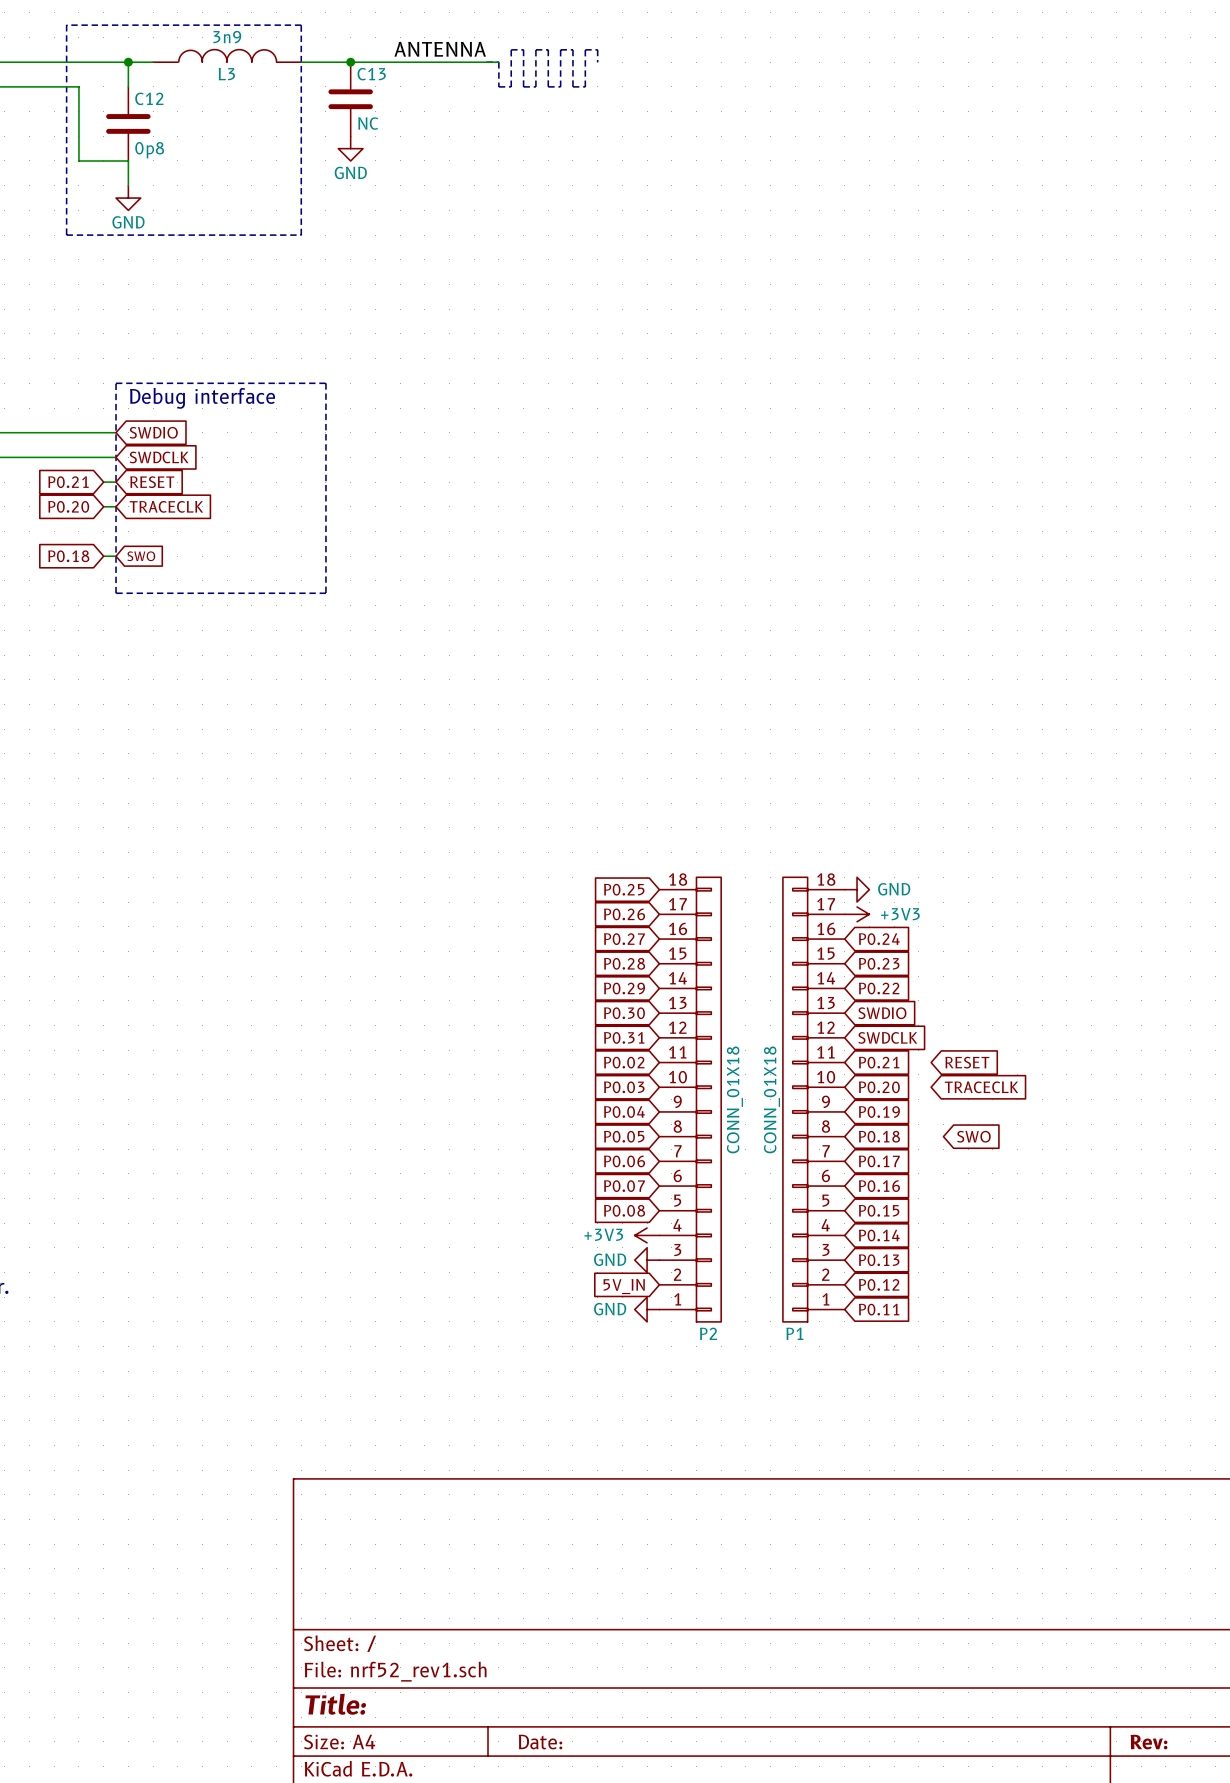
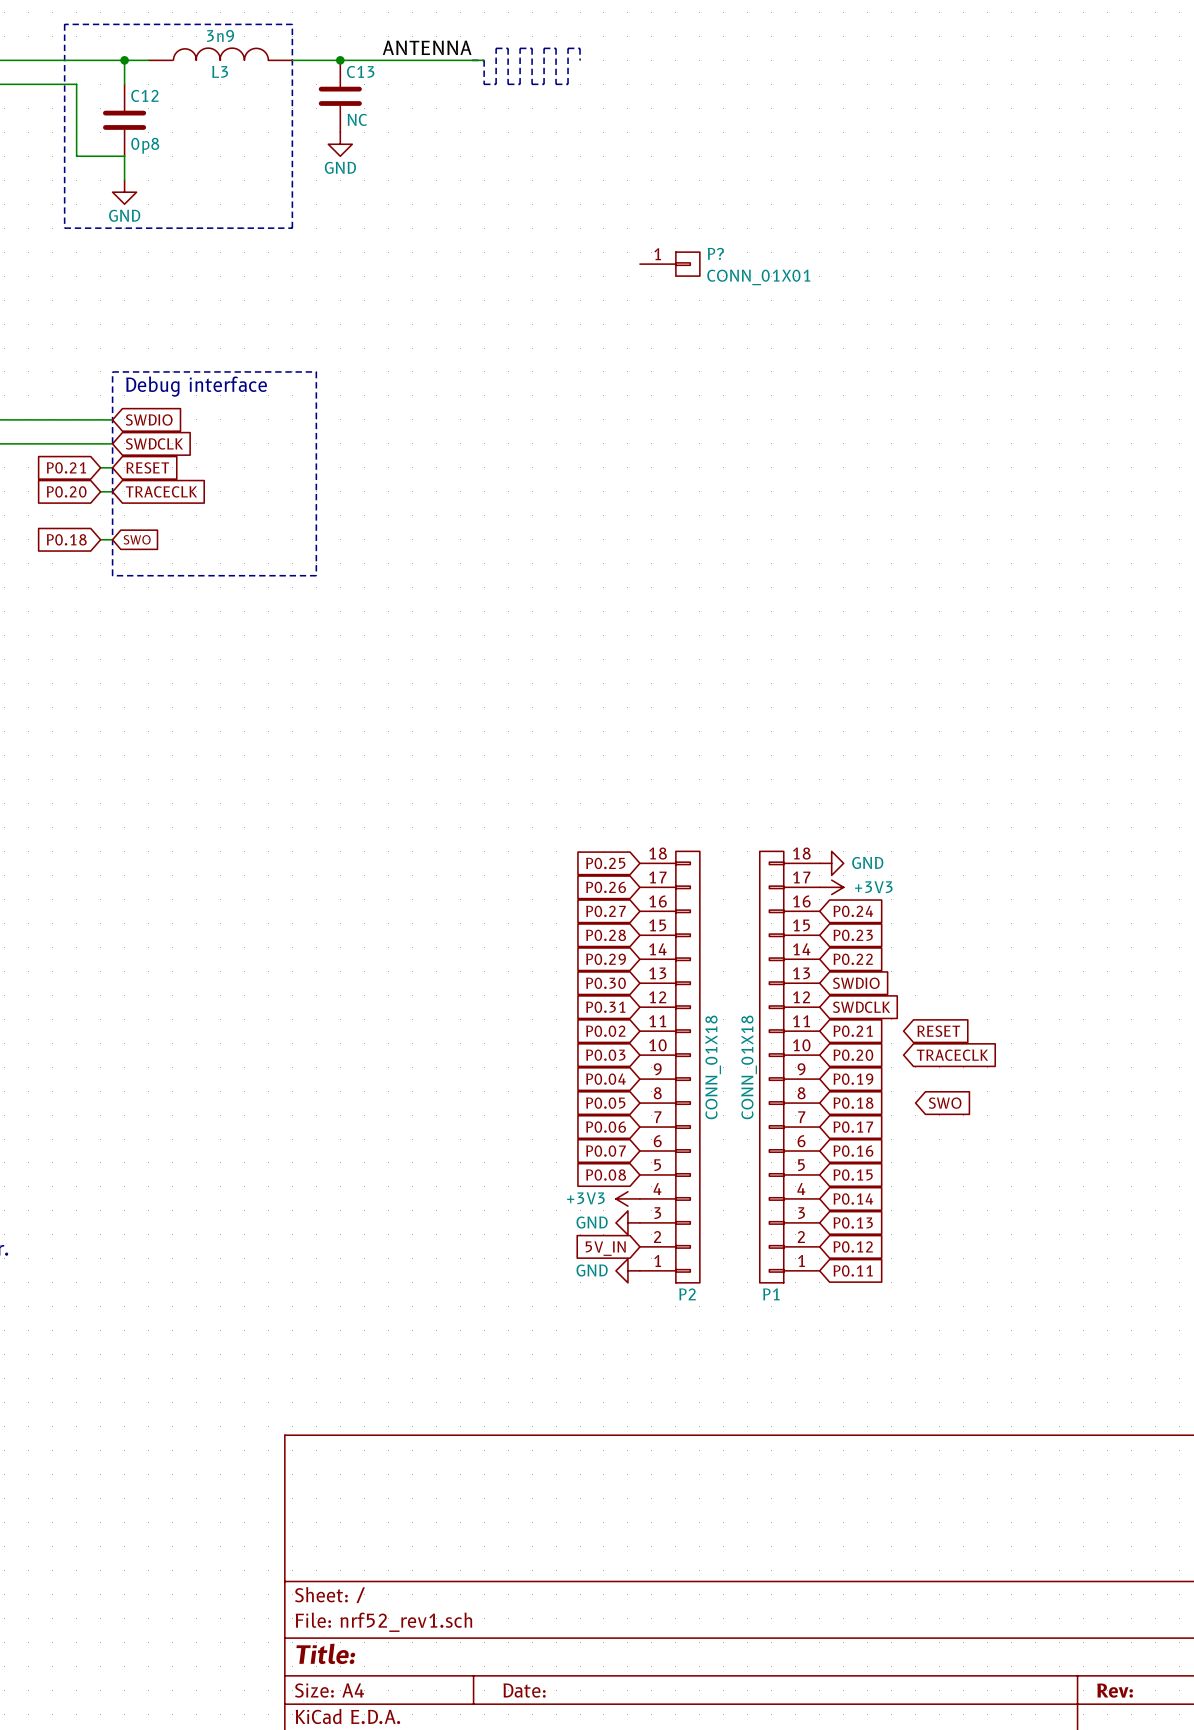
P?: none -> CONN_01X01 (669, 264)

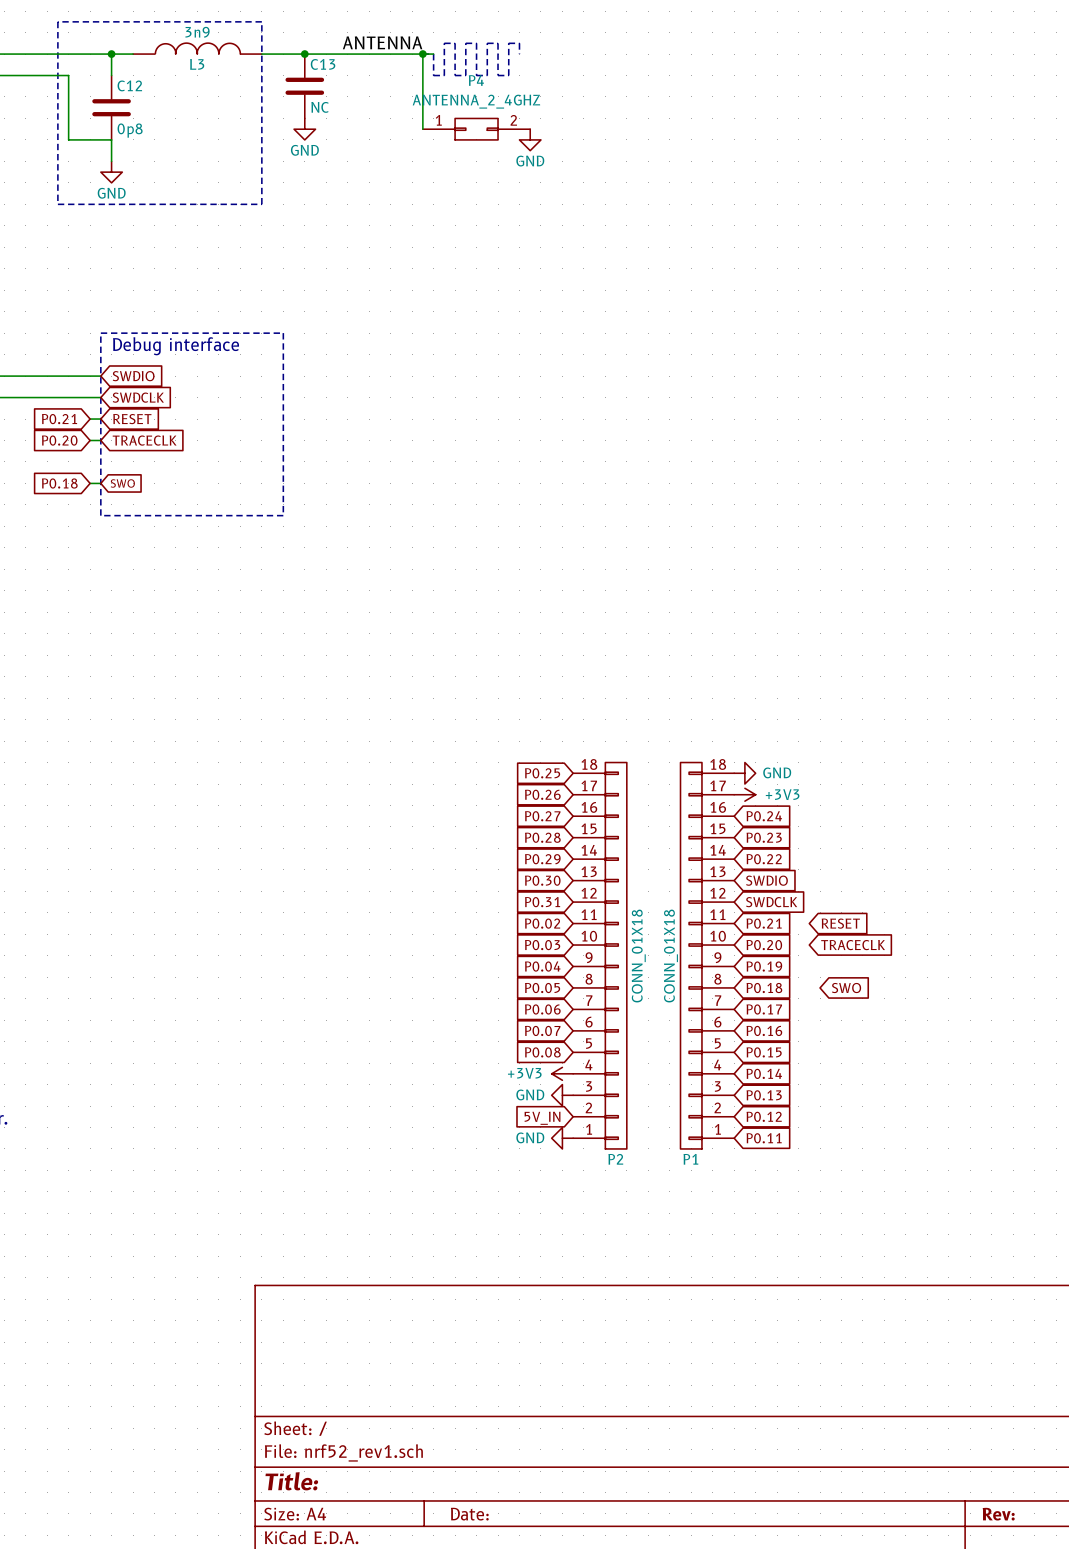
wire: none -> (422, 54) (422, 129)
junction: none -> (422, 54)
P4: none -> ANTENNA_2_4GHZ (476, 129)
power symbol: none -> GND (530, 139)
P?: CONN_01X01 (669, 264) -> none

